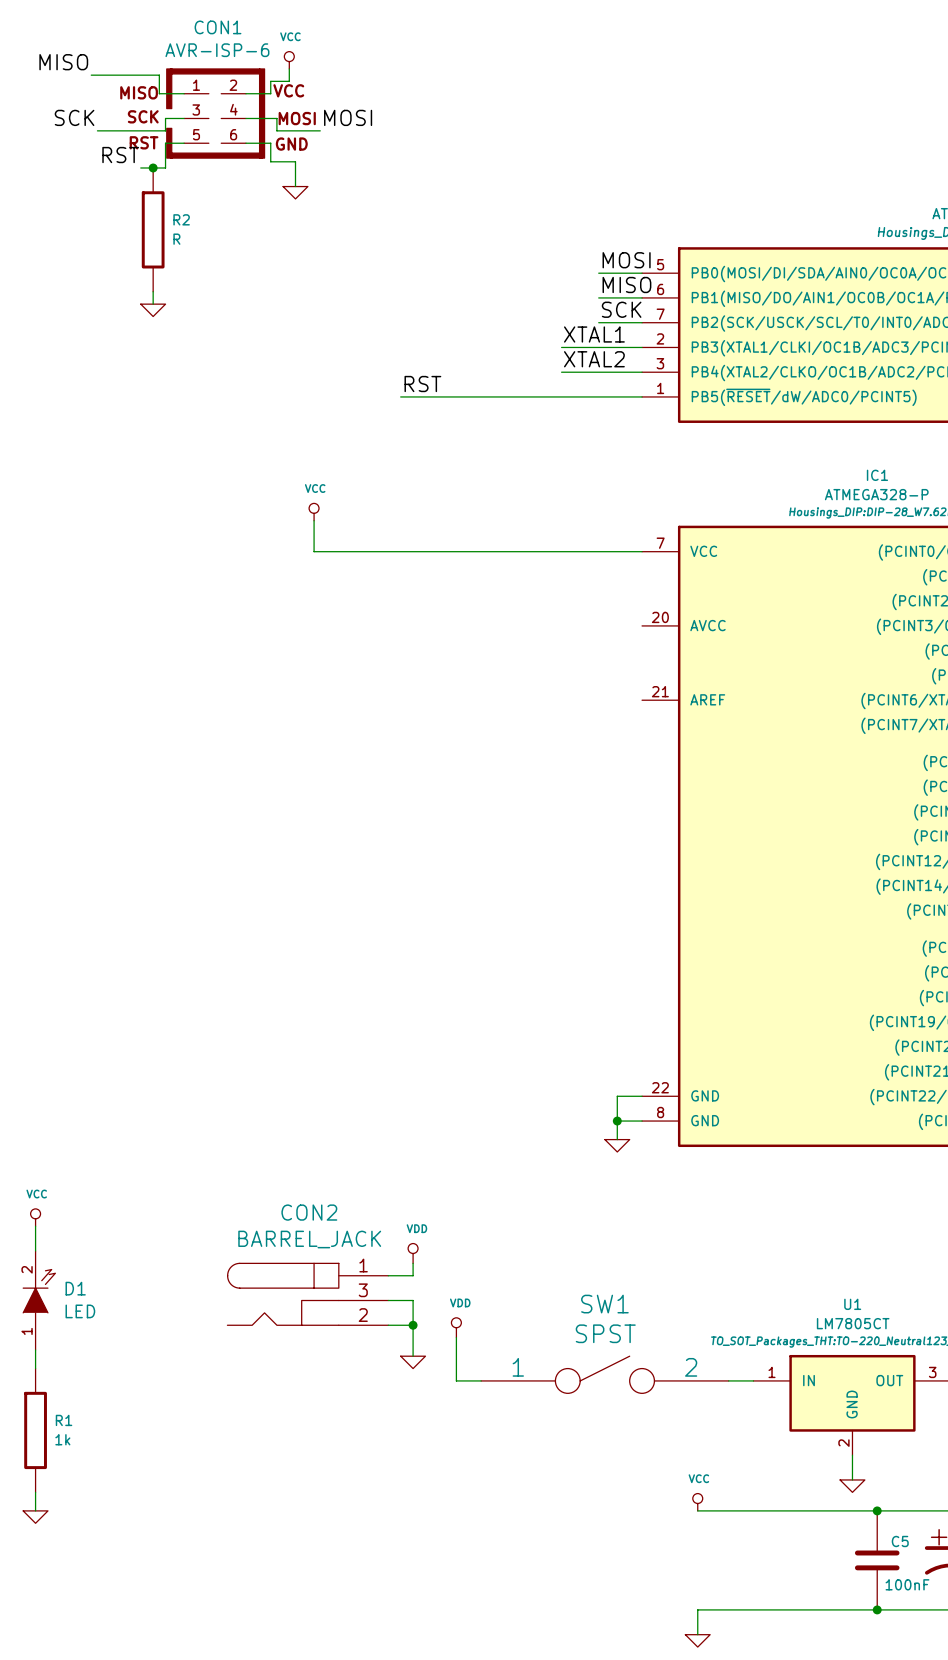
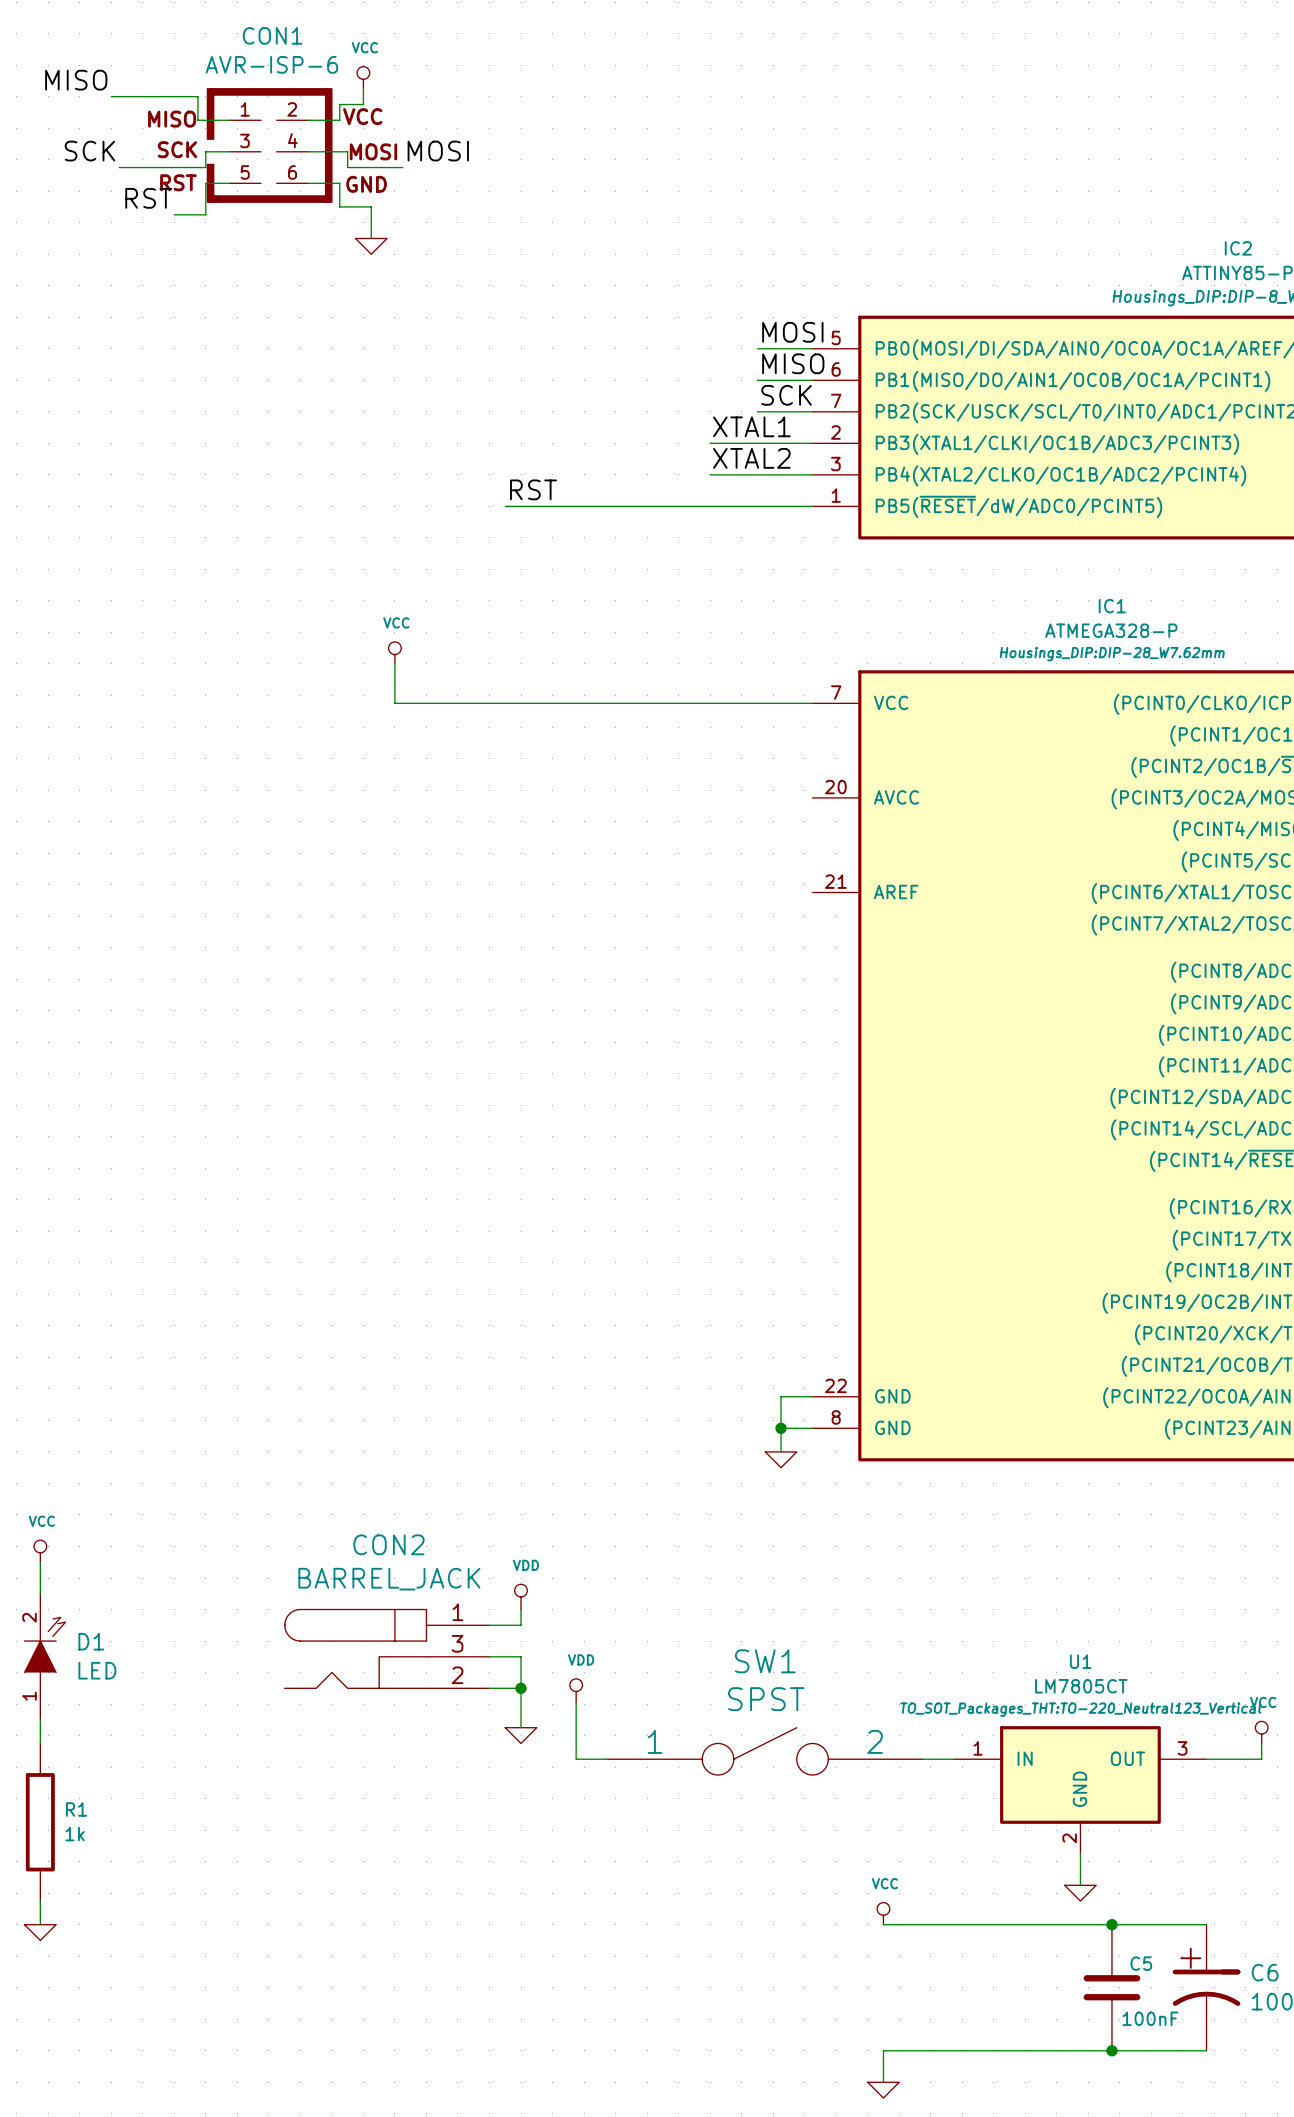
junction: (153, 167) -> none
R2: R (153, 229) -> none
wire: (153, 291) (153, 304) -> none
power symbol: (153, 310) -> none

